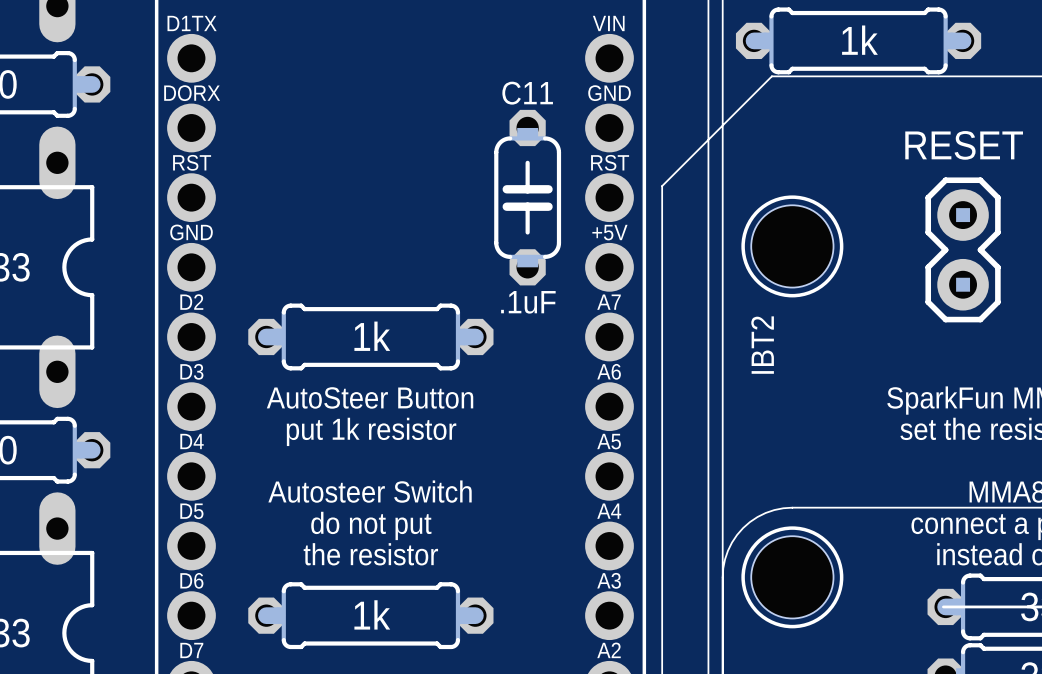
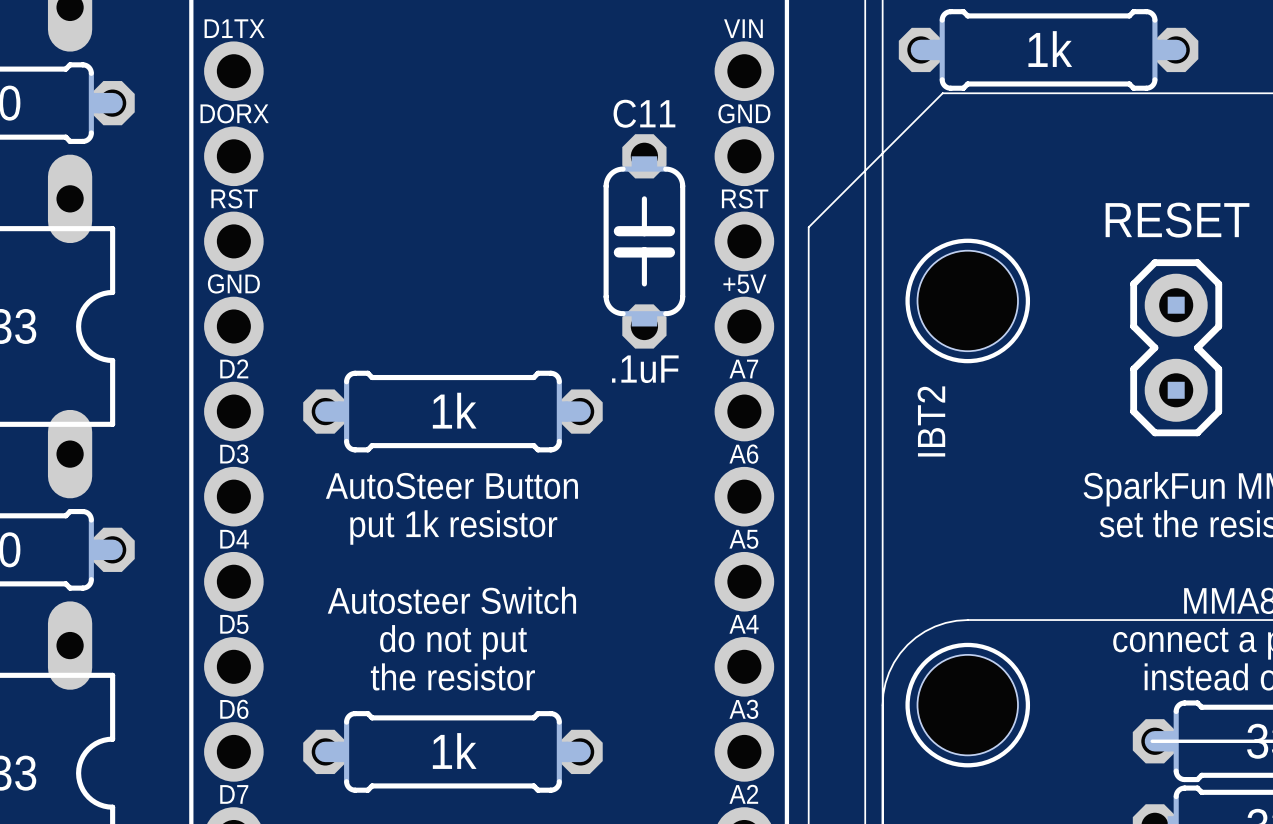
RESET position: (963, 249) -> (1176, 347)

